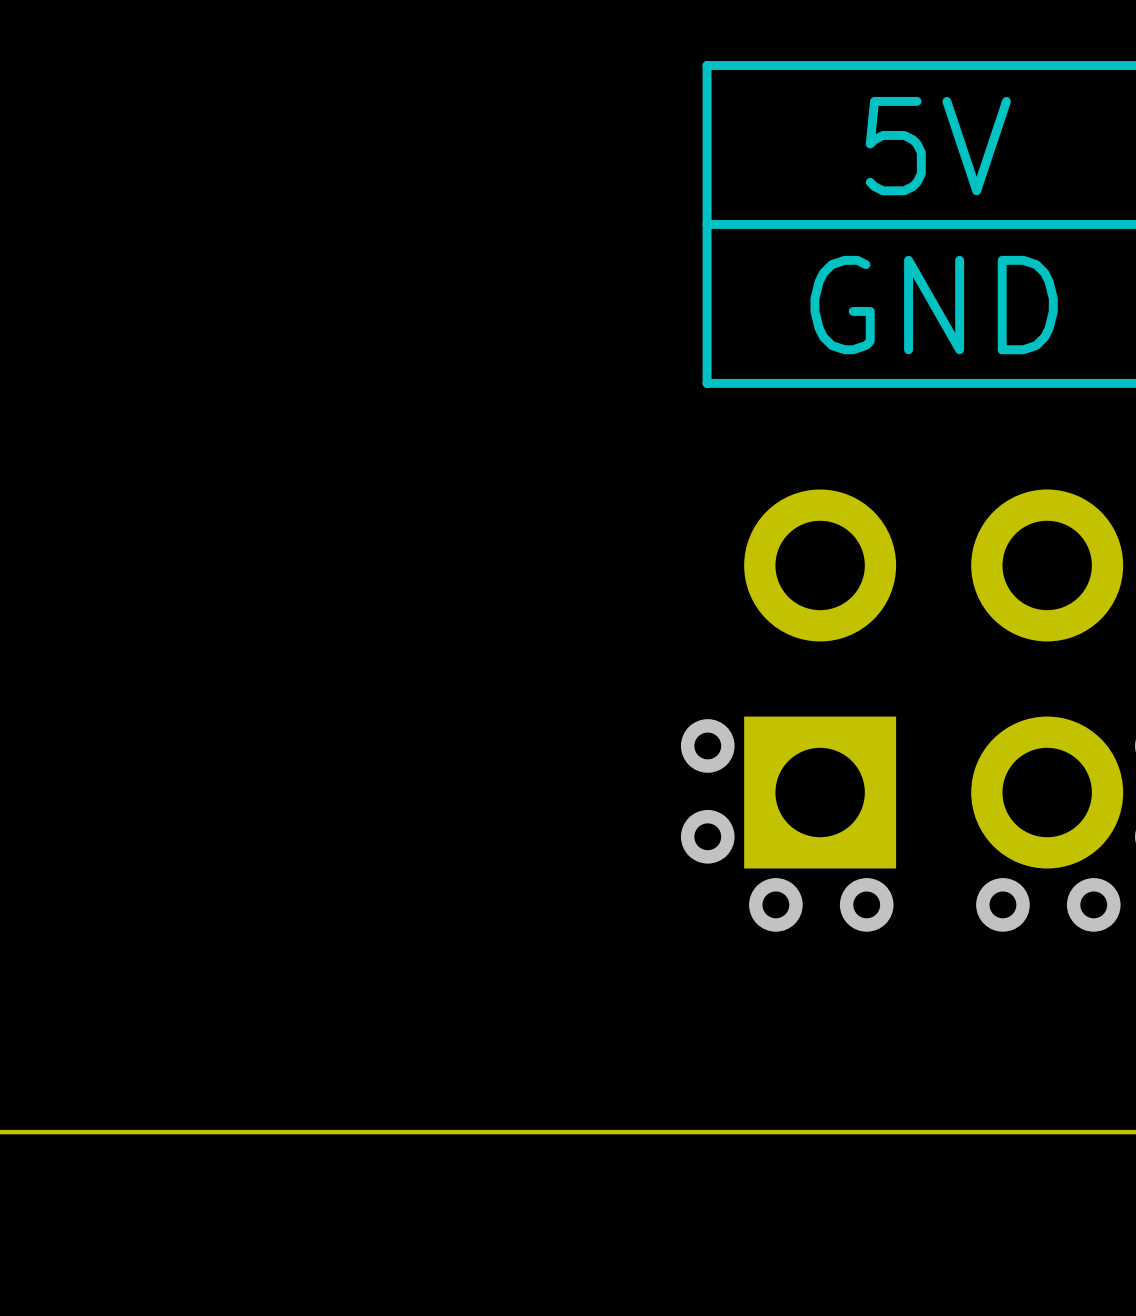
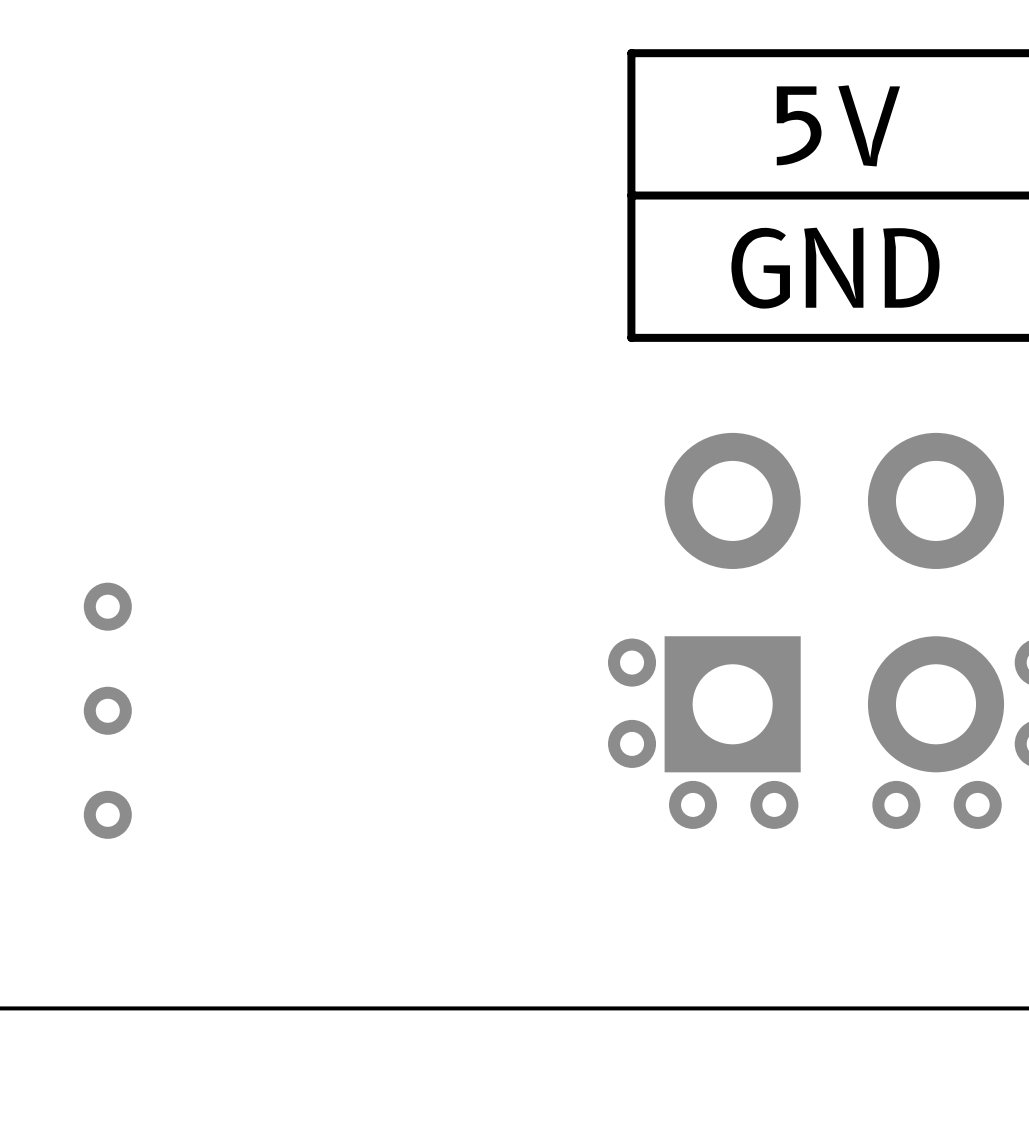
via: none -> (107, 606)
via: none -> (107, 710)
via: none -> (107, 814)

